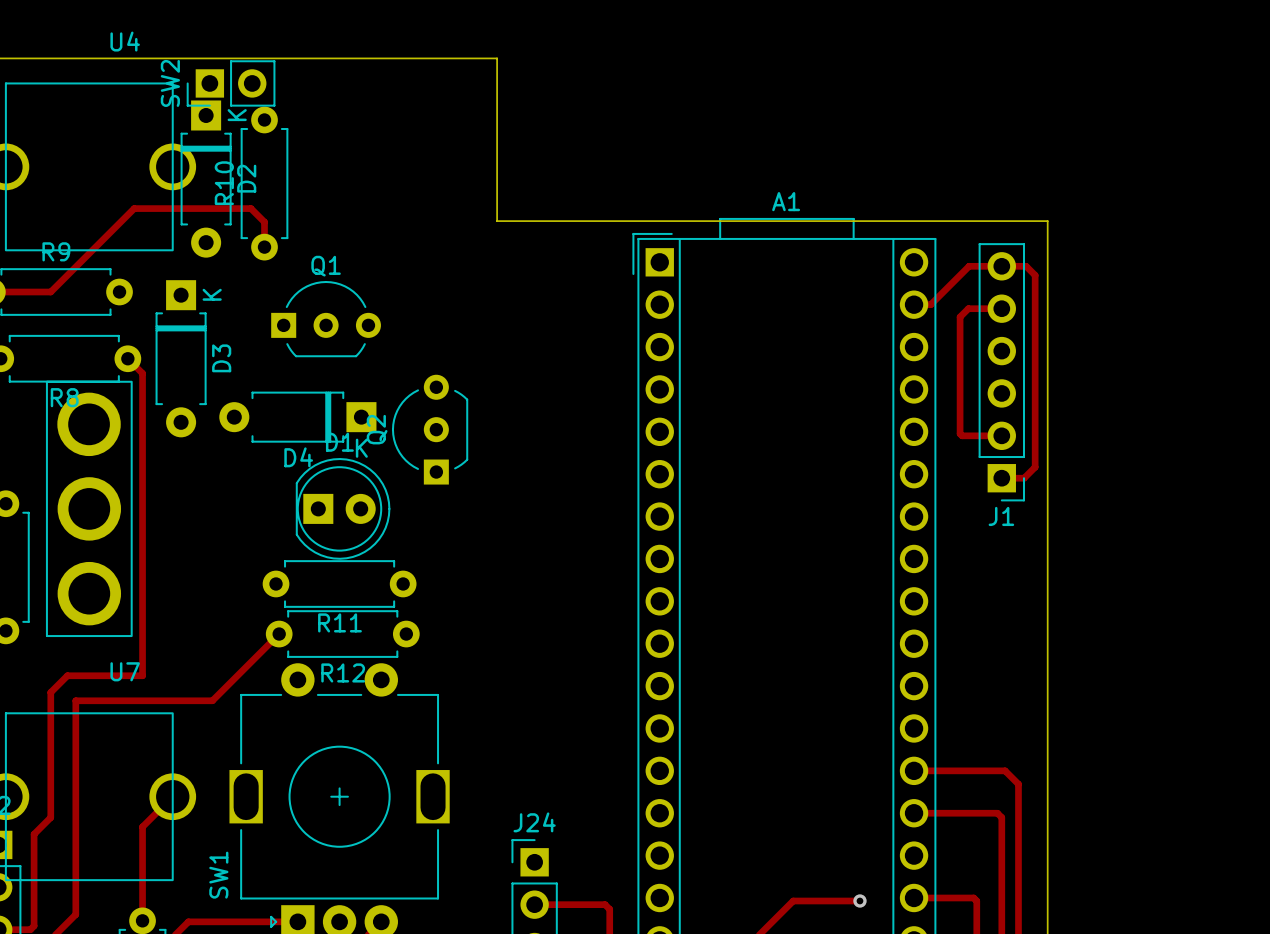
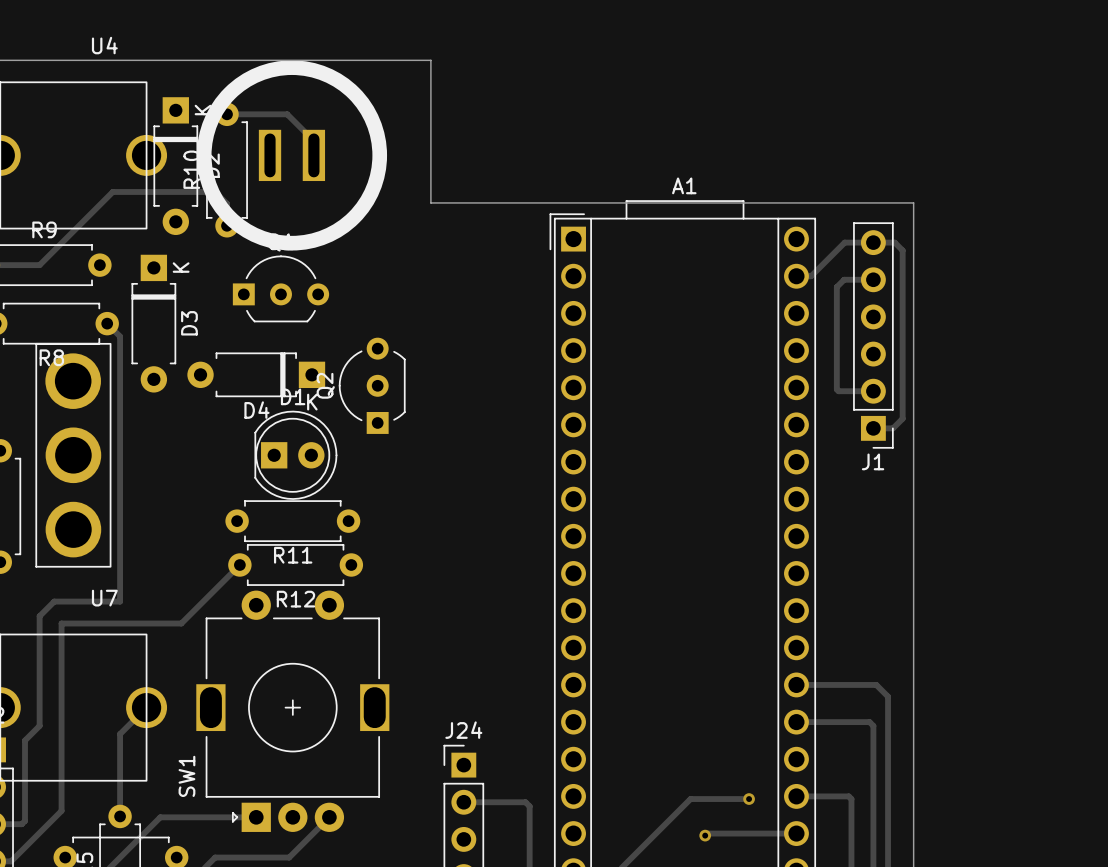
SW2: (231, 83) -> none
track: none -> (227, 114) (287, 114) (313, 140) (313, 155)
part: none -> (291, 155)

